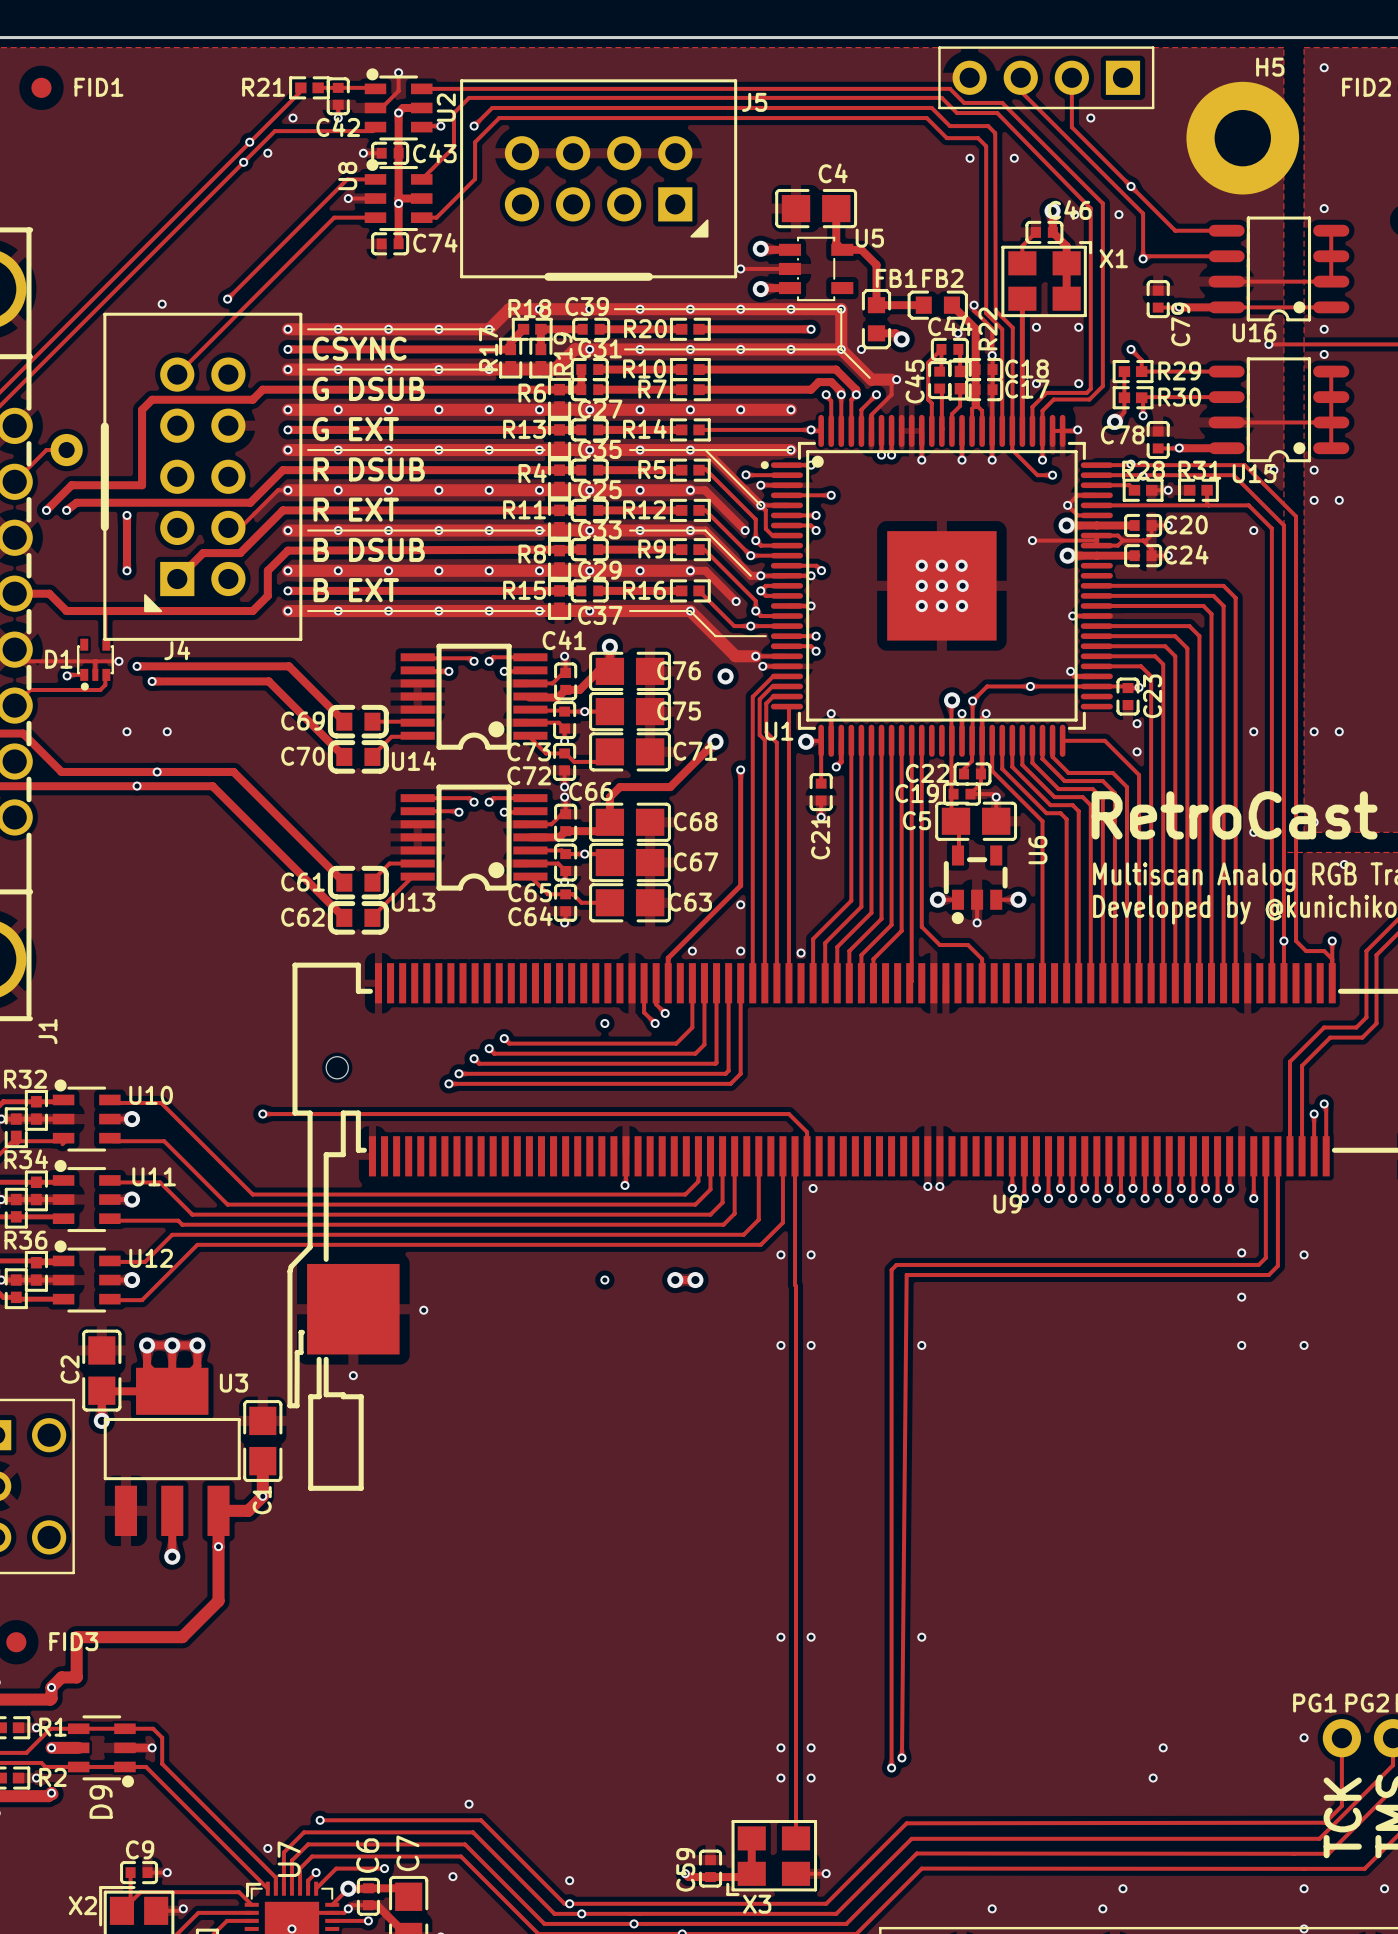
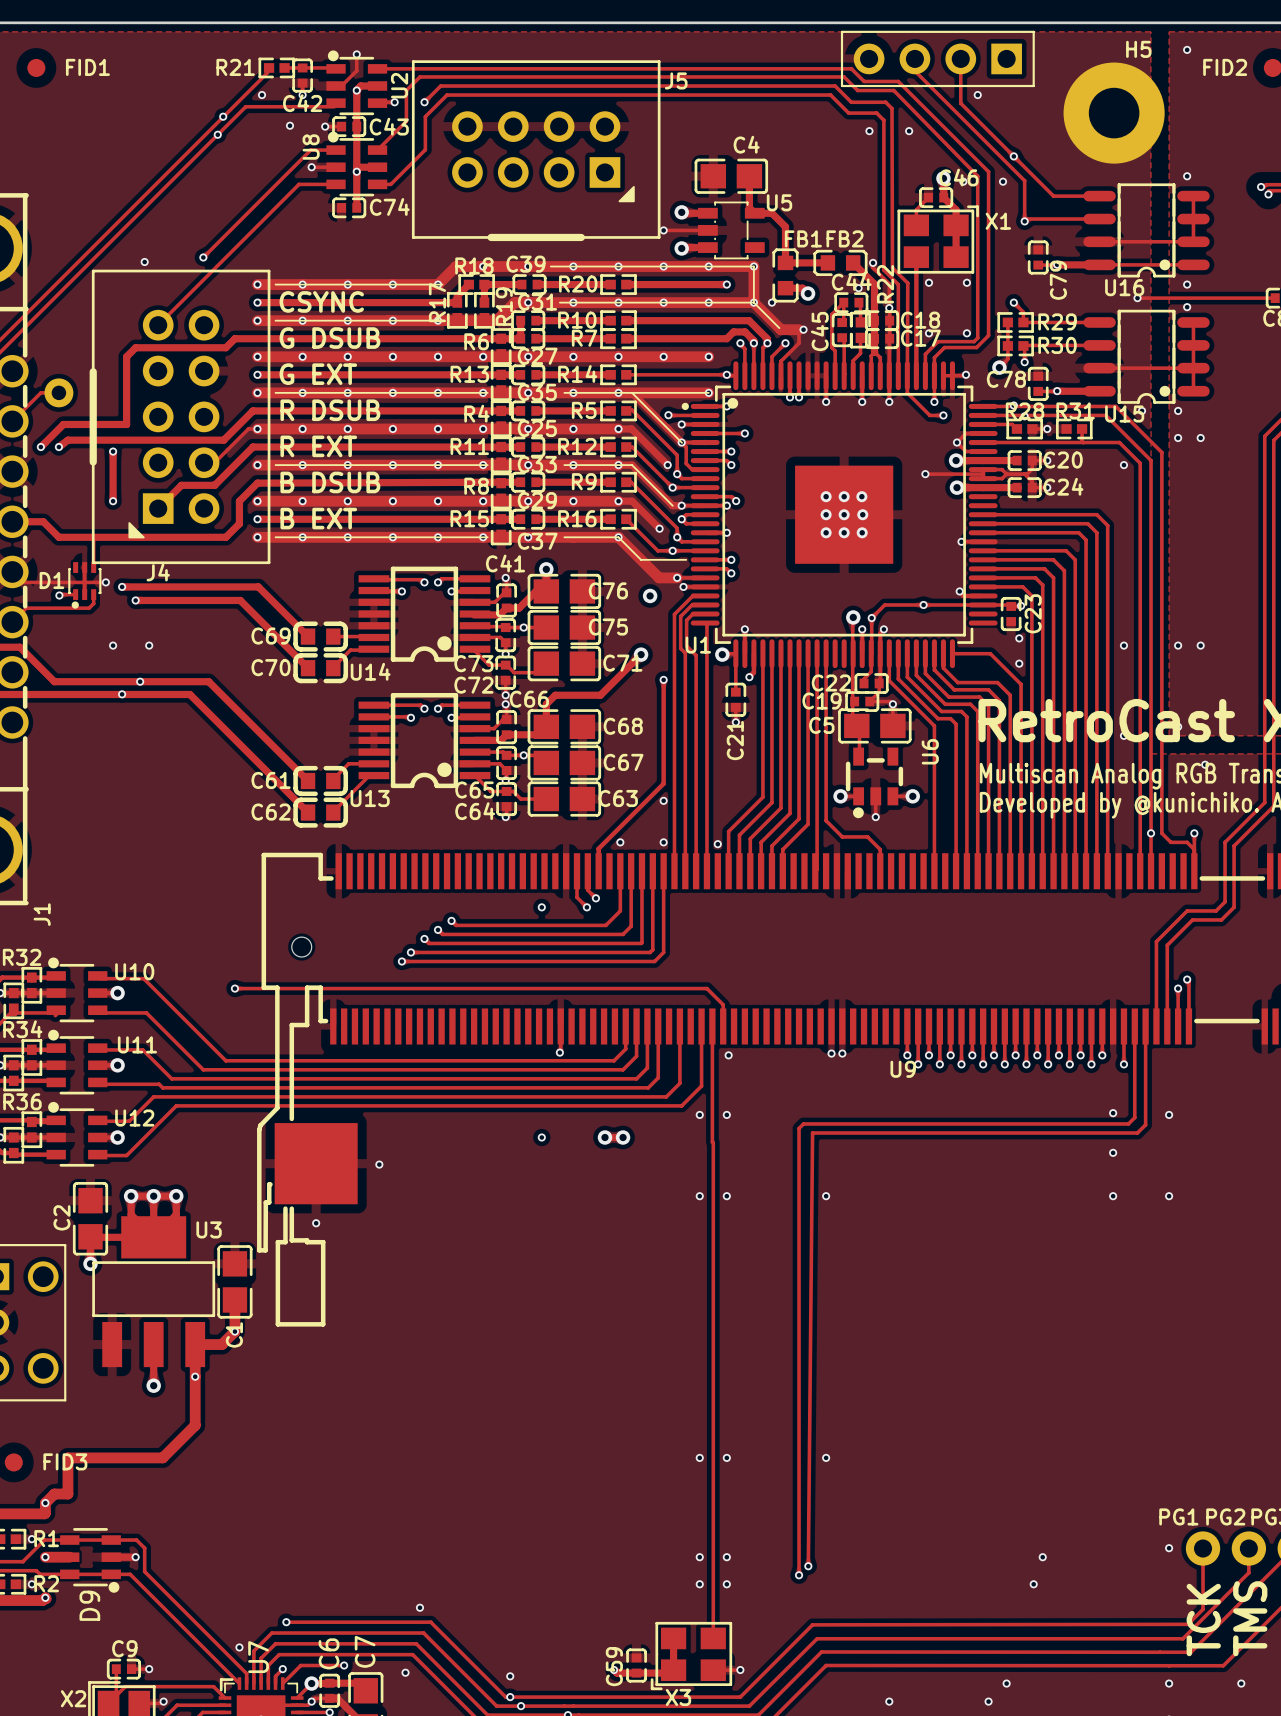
via position: (267, 153) -> (289, 125)
D1 footprint: [76, 638, 115, 691] -> [68, 562, 102, 609]
track: none -> (84, 567) (84, 582)

